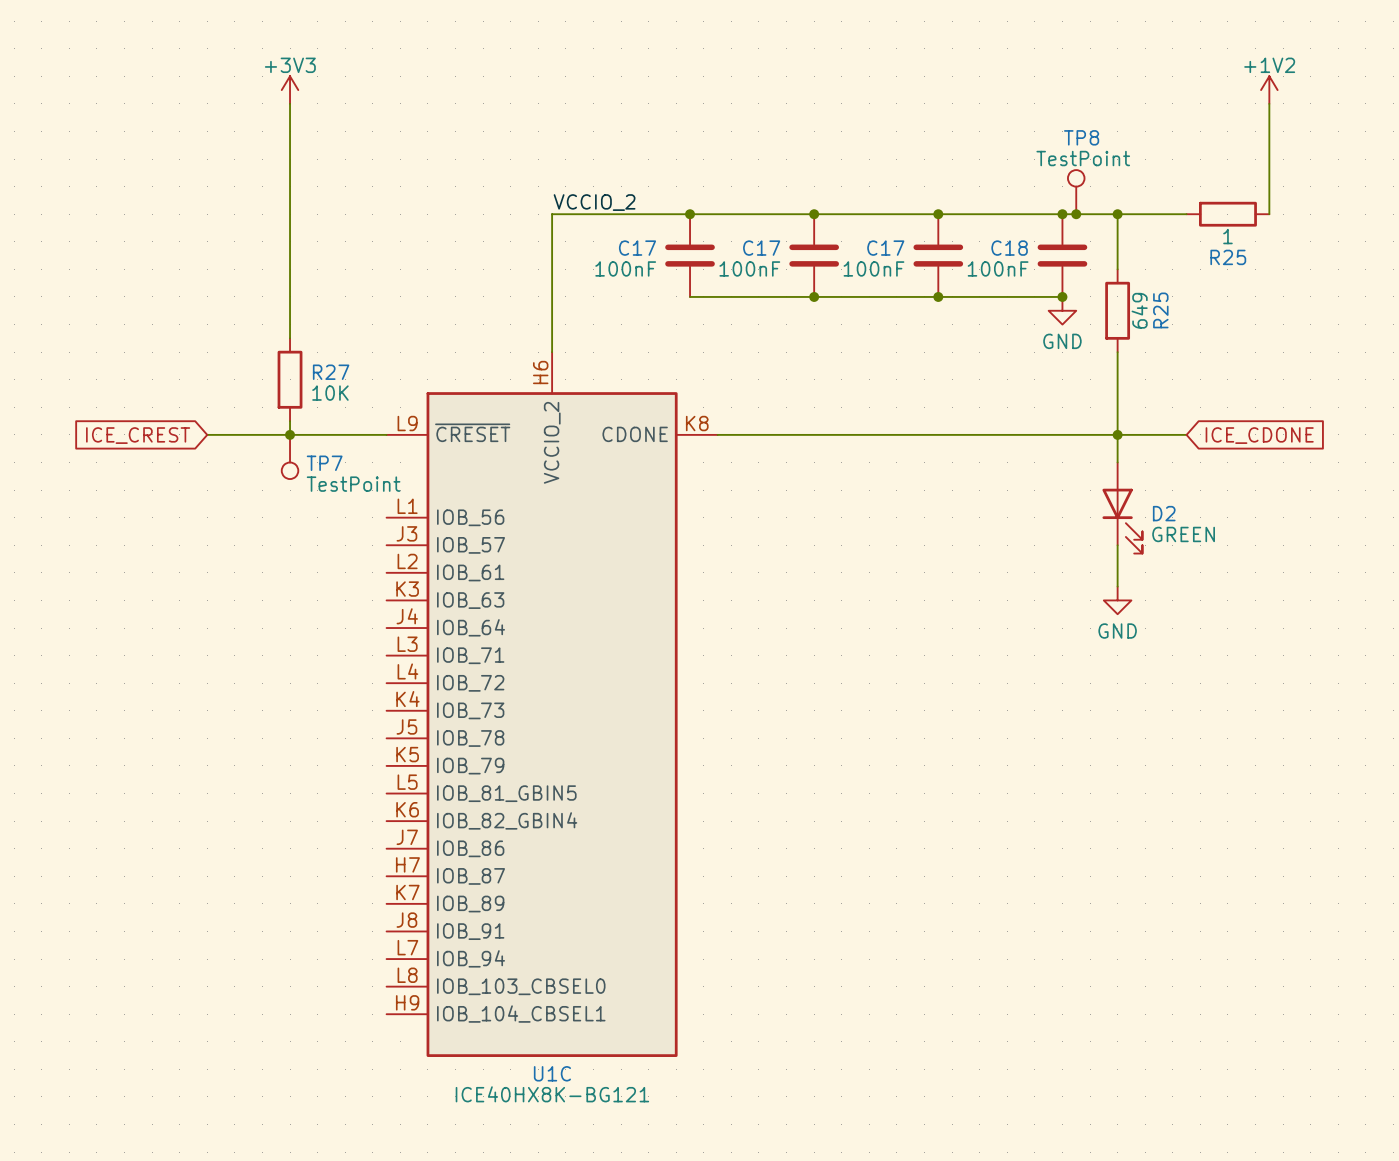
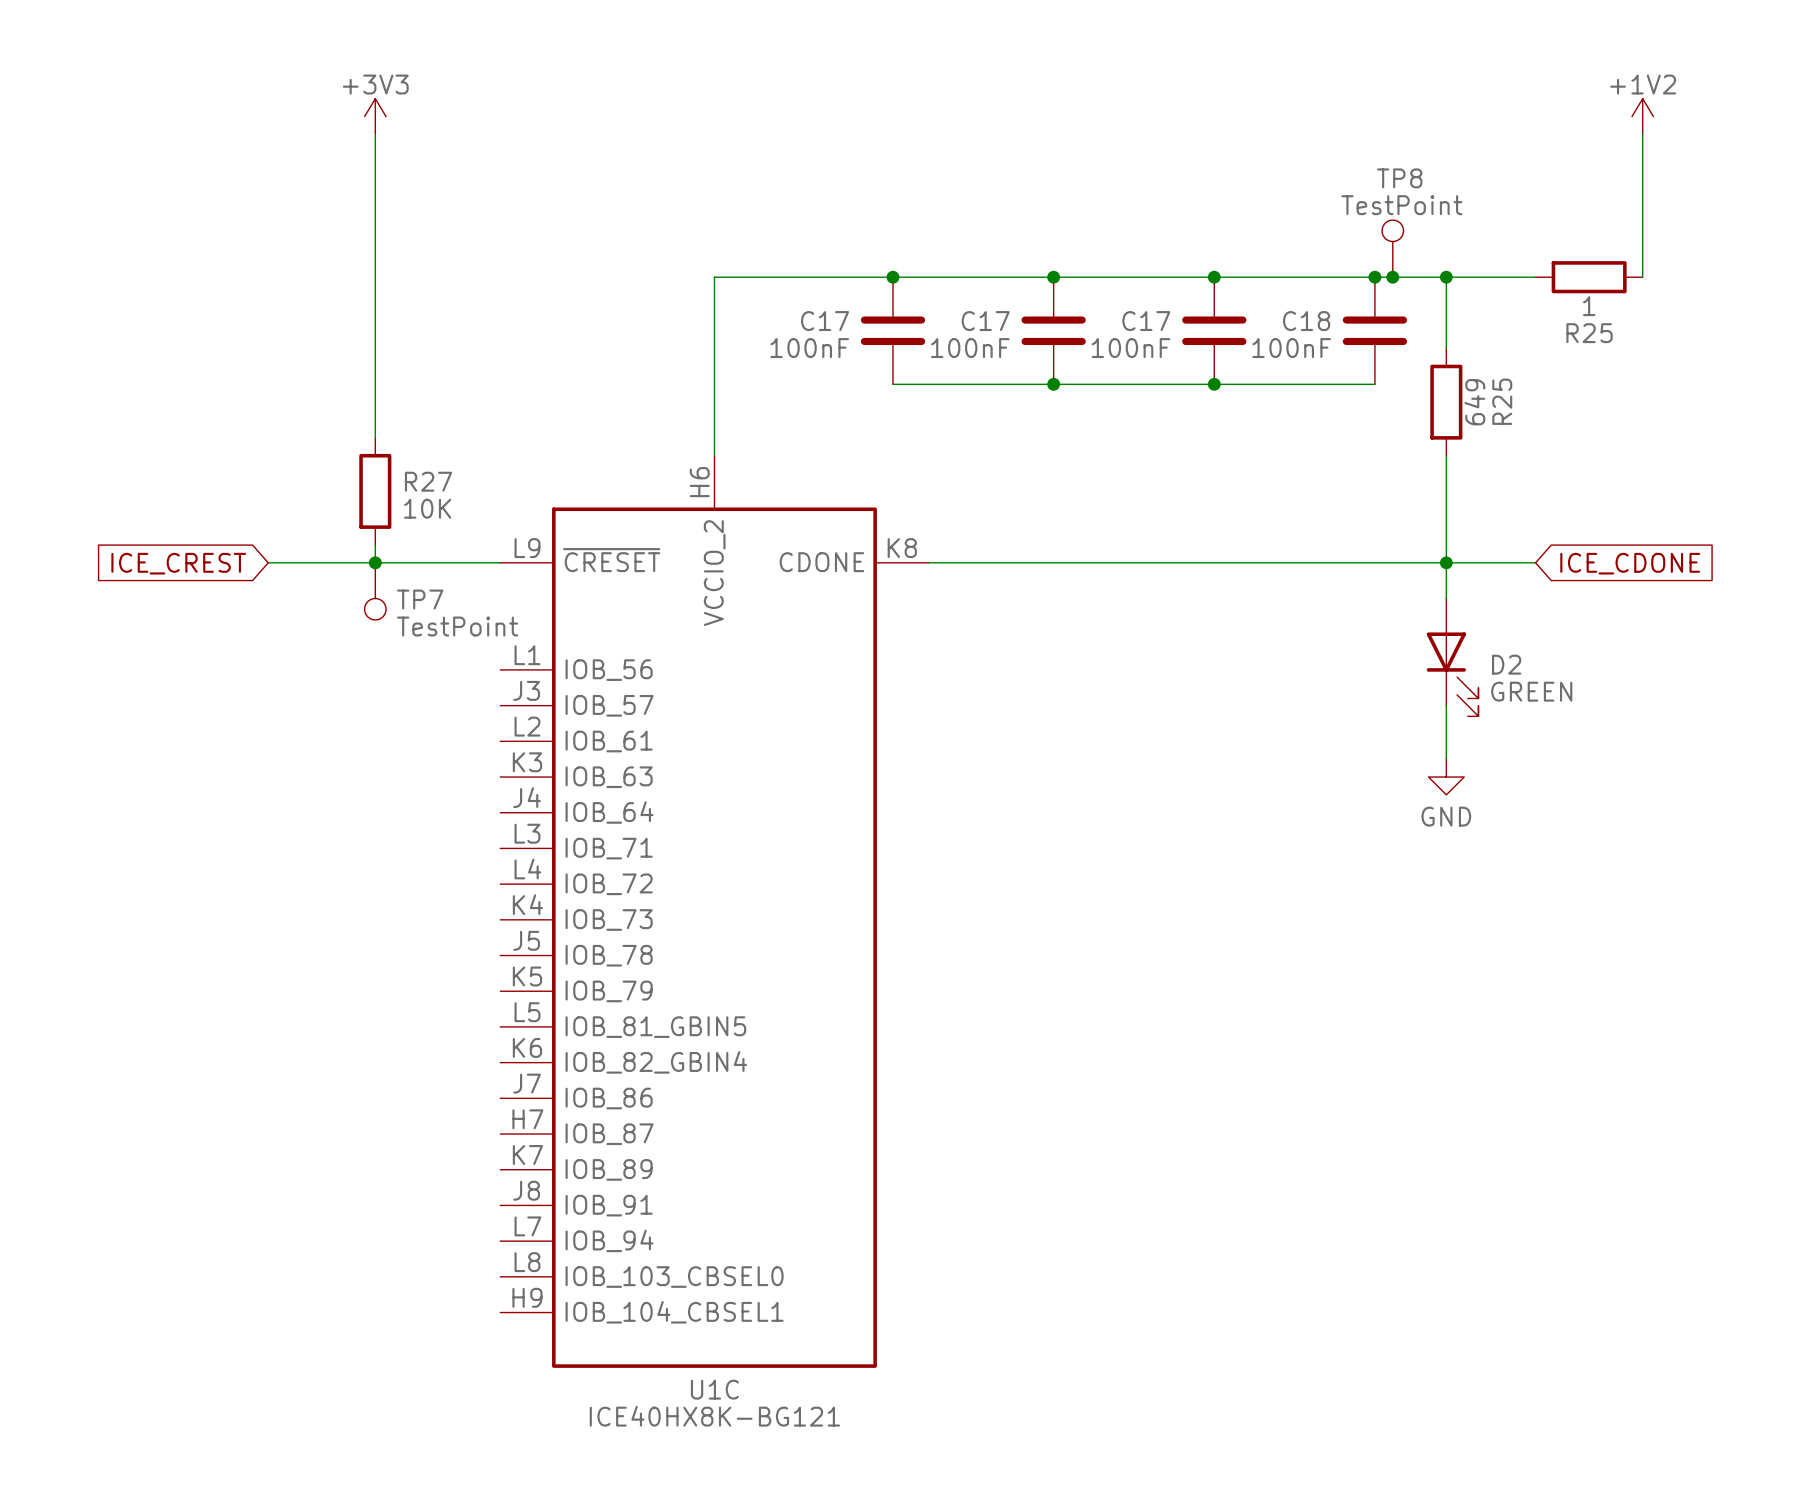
label: VCCIO_2 (594, 202) -> none
junction: (1062, 296) -> none
power symbol: GND (1062, 310) -> none

